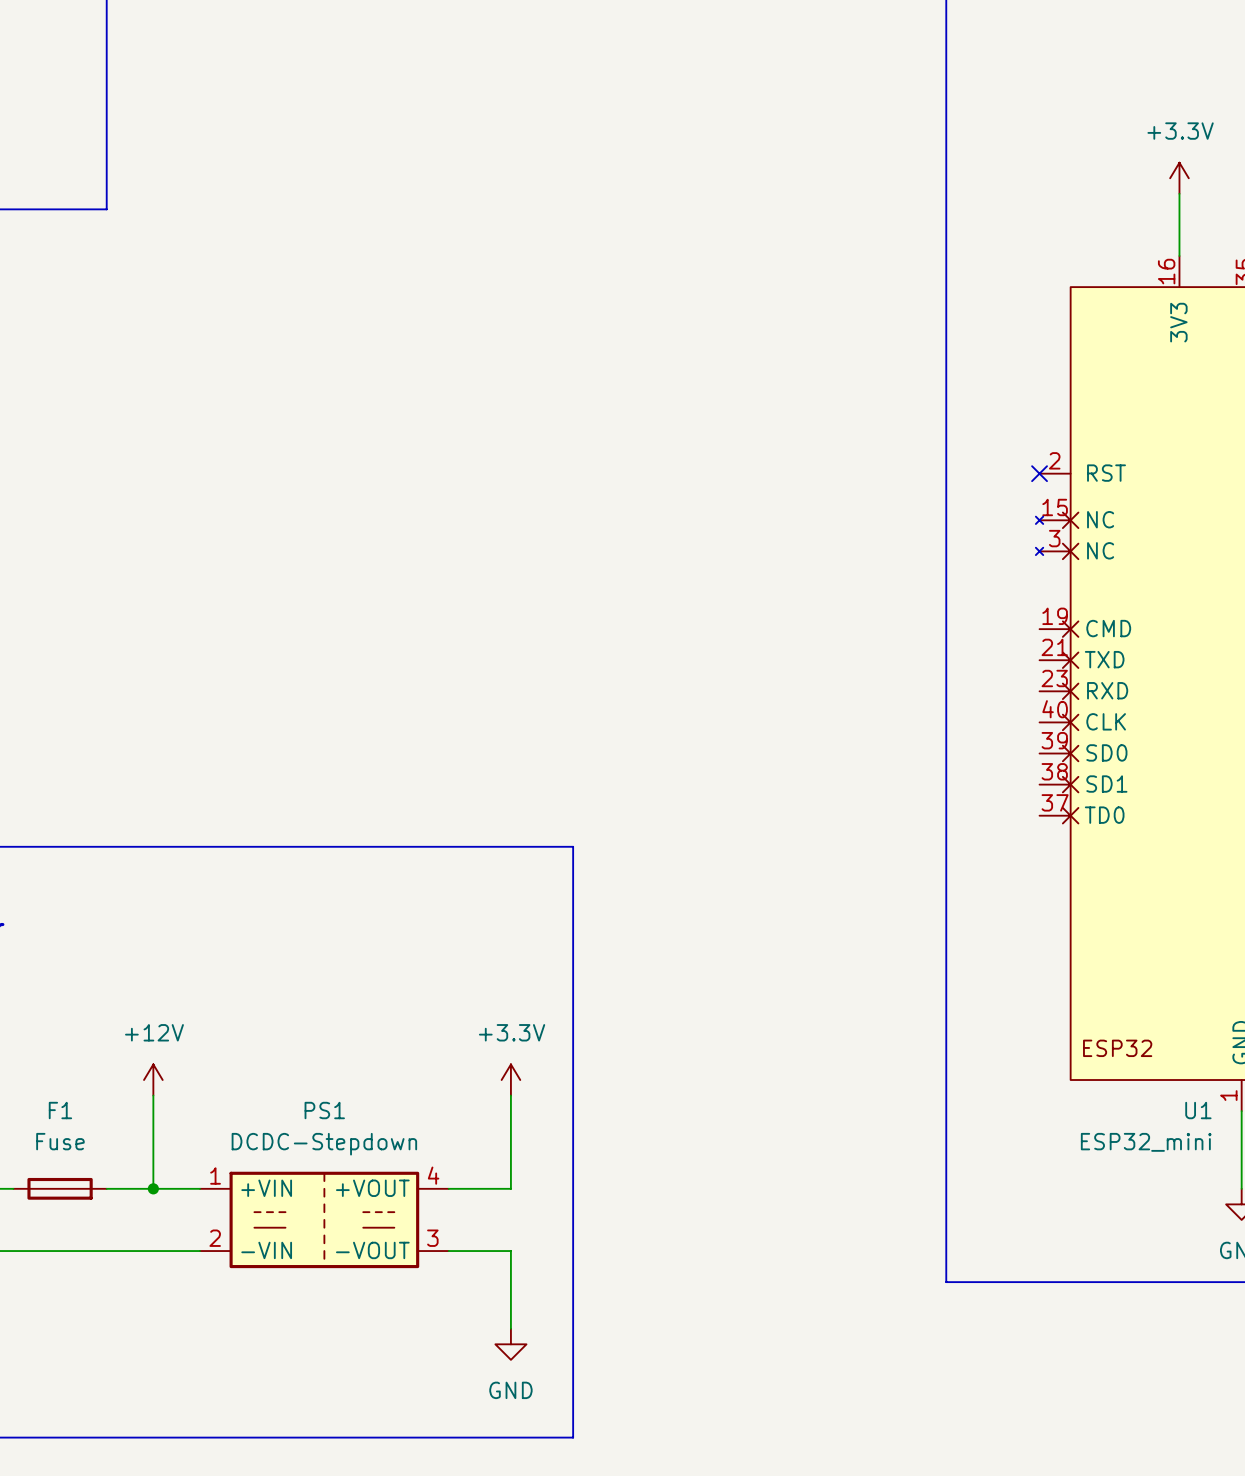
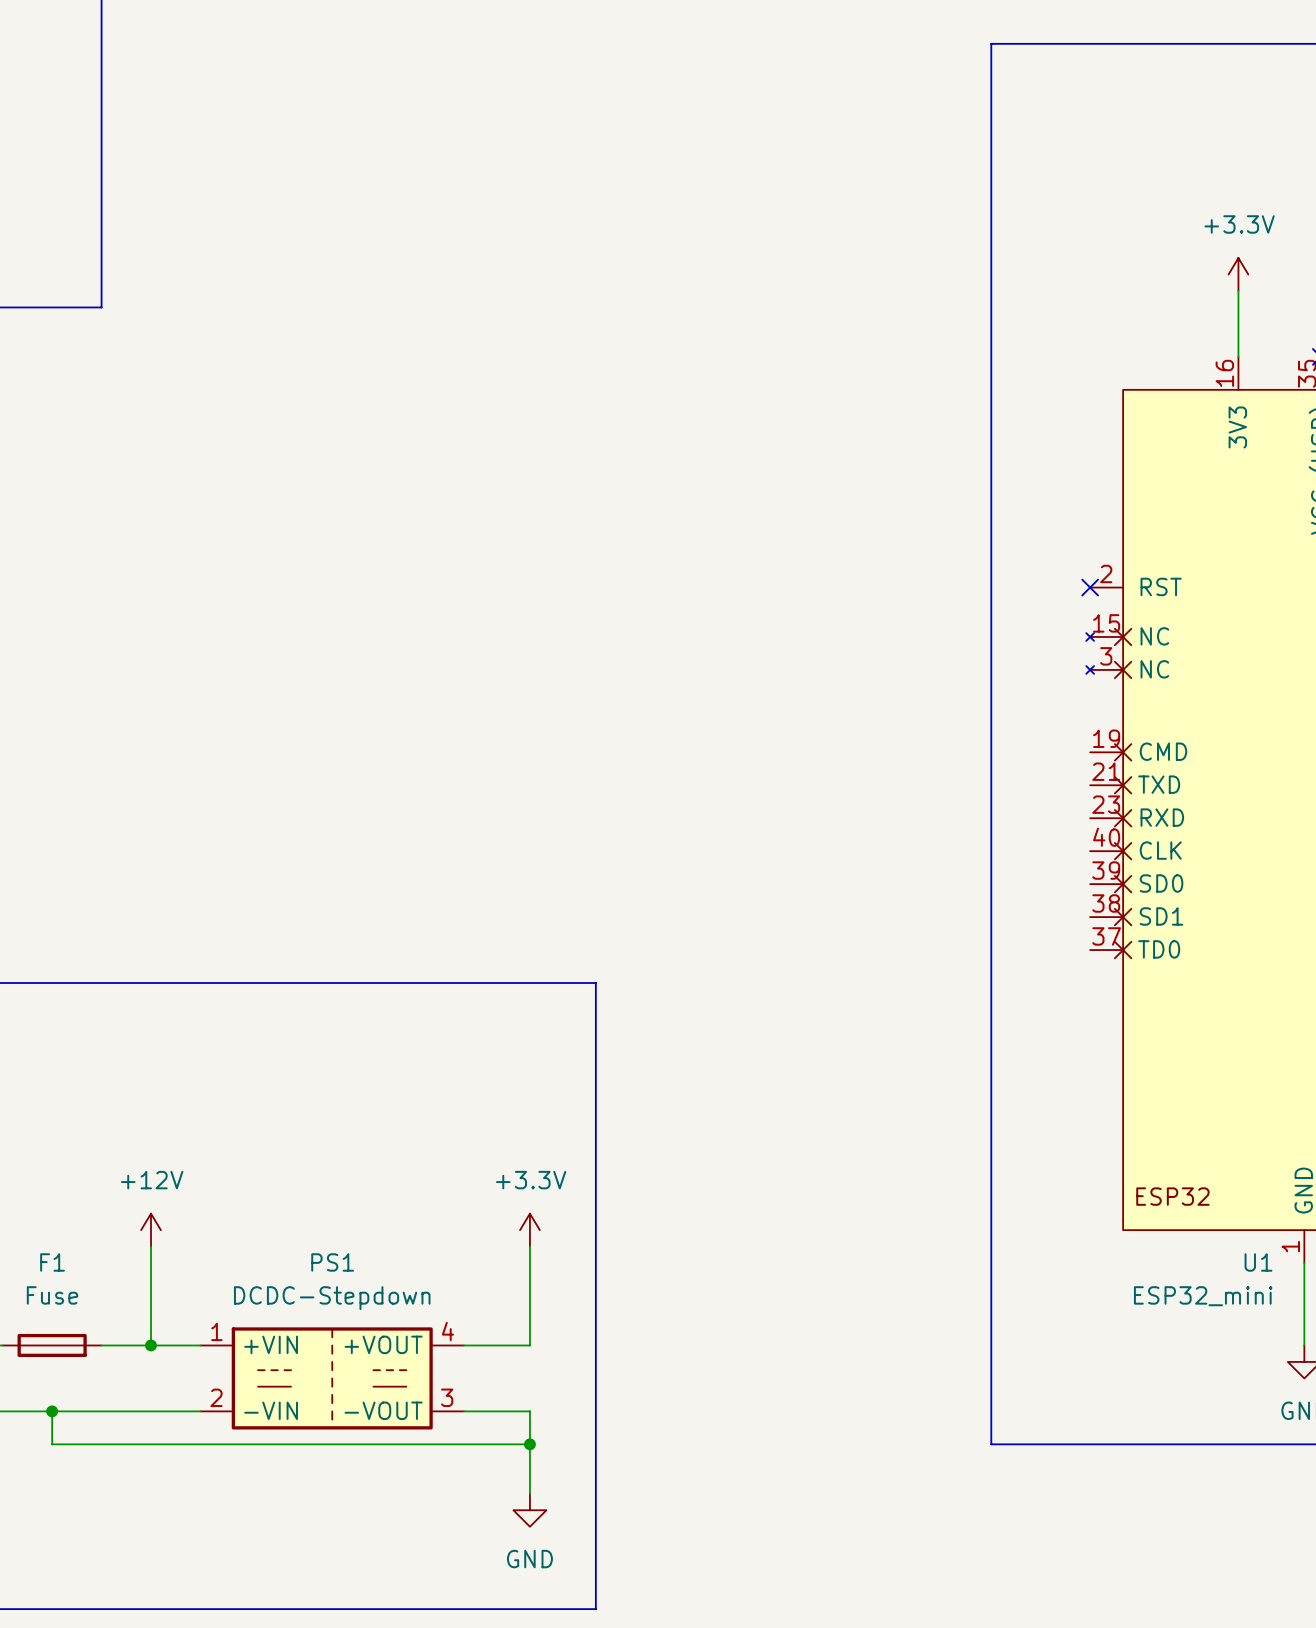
wire: none -> (52, 1411) (52, 1444) (529, 1444)
junction: none -> (52, 1411)
junction: none -> (529, 1444)

